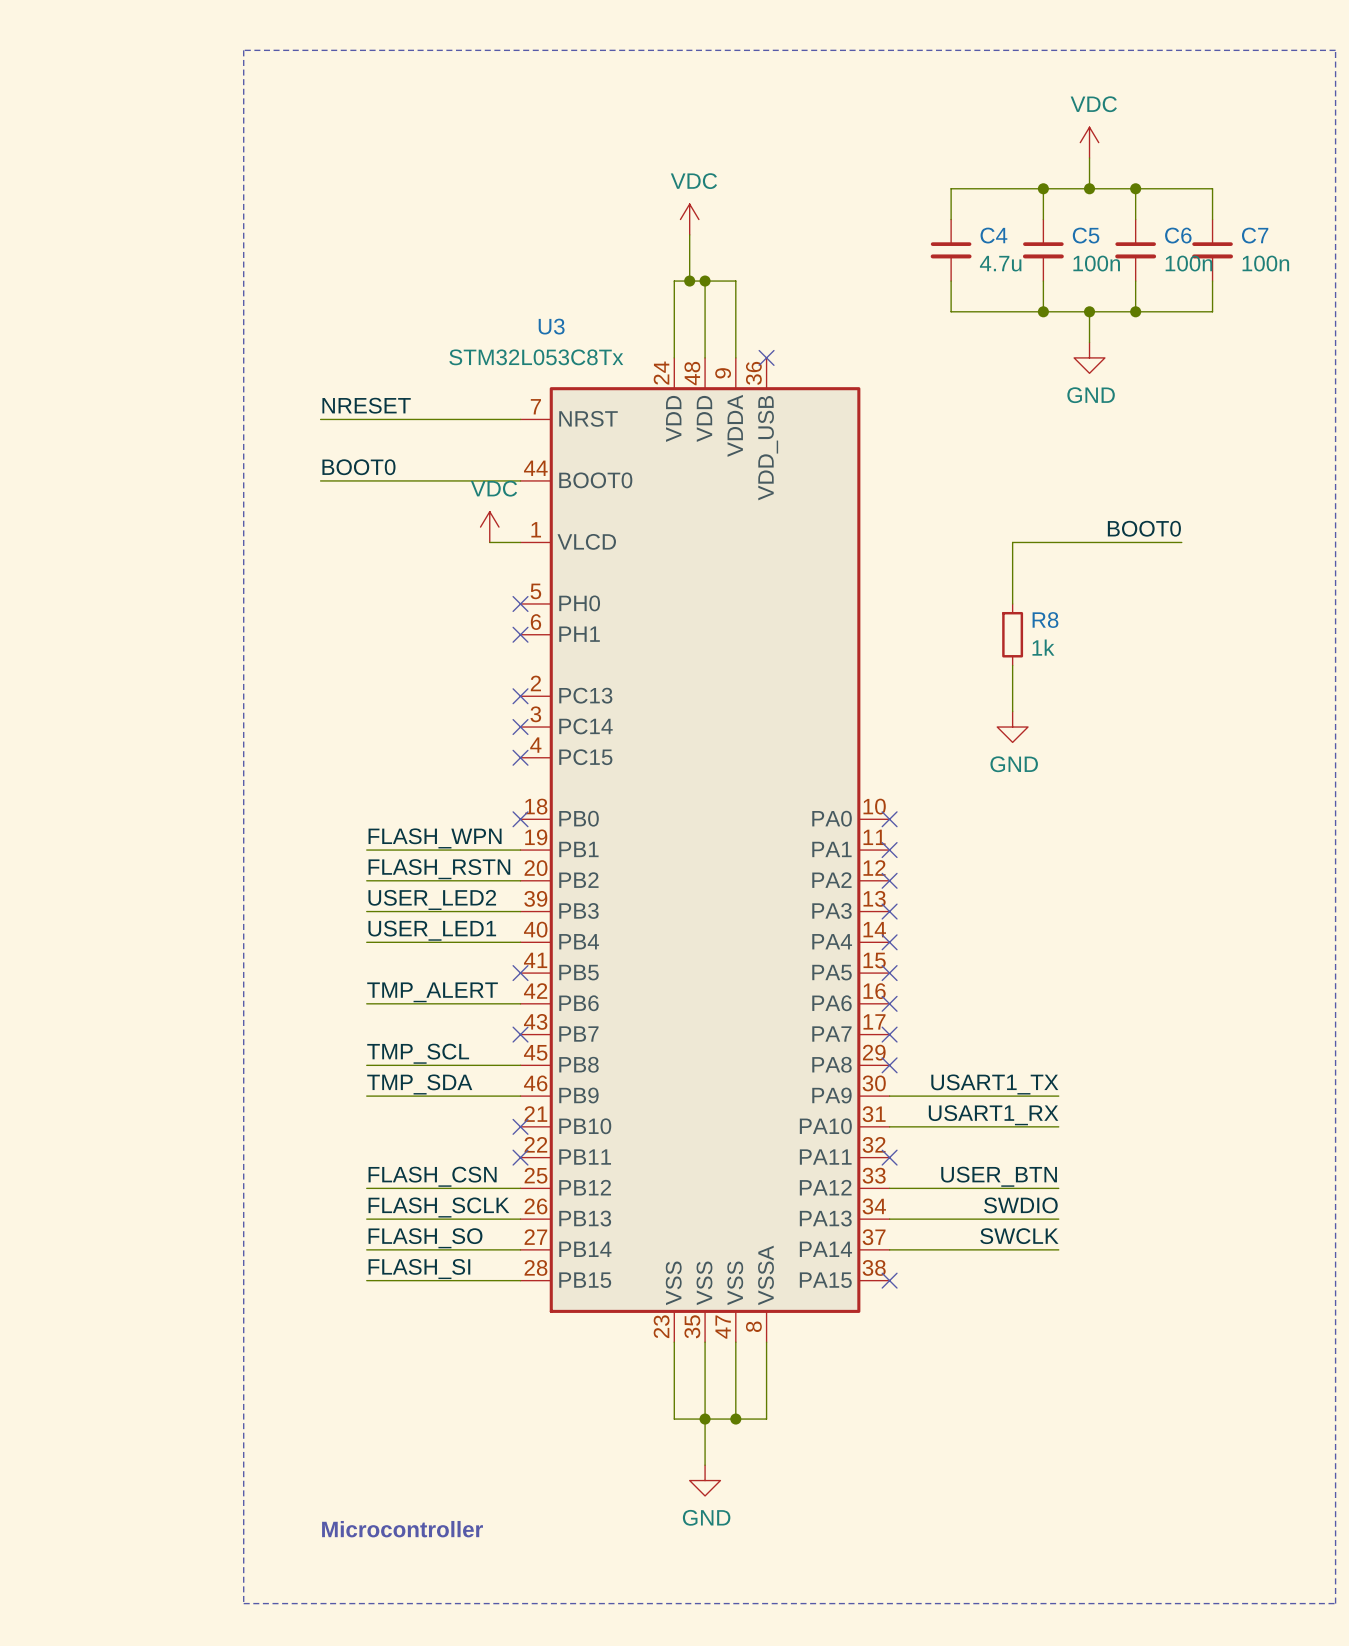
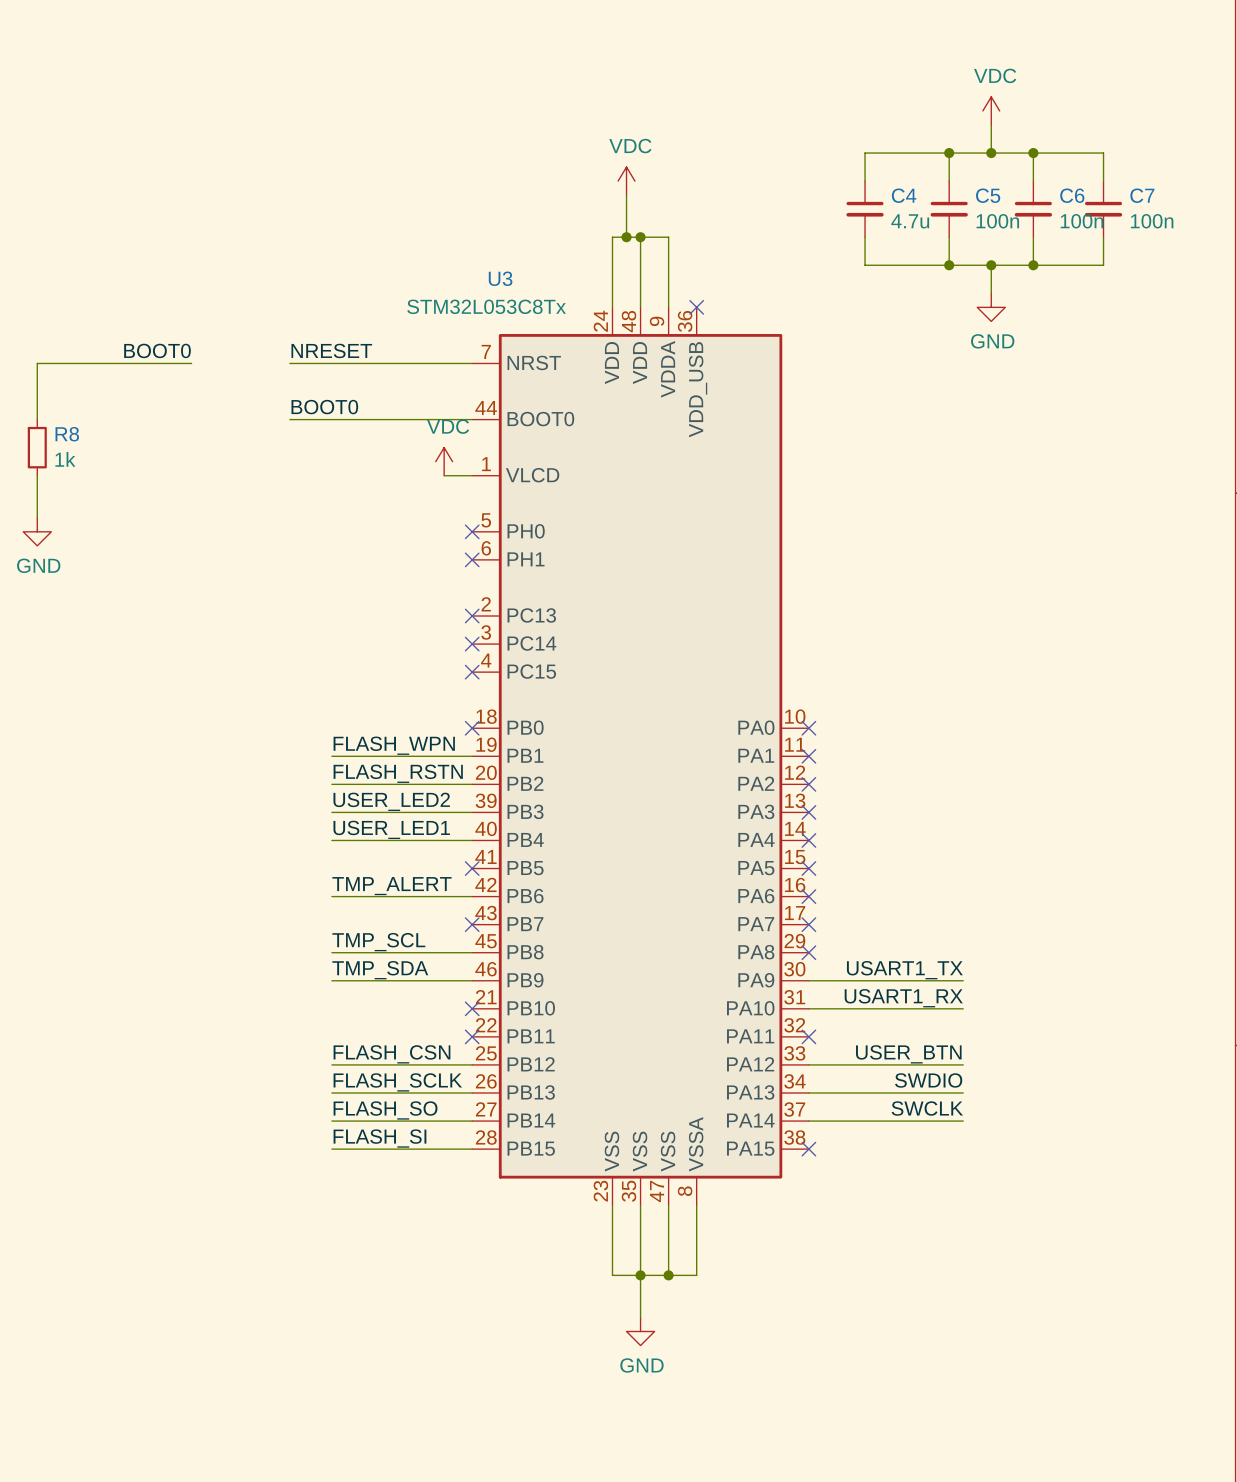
line: (243, 50) (1335, 50) (1335, 1603) (243, 1603) (243, 50) -> none
label: none -> BOOT0 (157, 350)
wire: none -> (191, 363) (37, 363) (37, 419)
label: BOOT0 (1144, 528) -> none
wire: none -> (37, 475) (37, 517)
wire: (1181, 542) (1012, 542) (1012, 603) -> none
power symbol: none -> GND (37, 531)
R8 position: (1012, 634) -> (37, 447)
wire: (1012, 665) (1012, 711) -> none
power symbol: GND (1012, 727) -> none
text: Microcontroller (402, 1529) -> none

